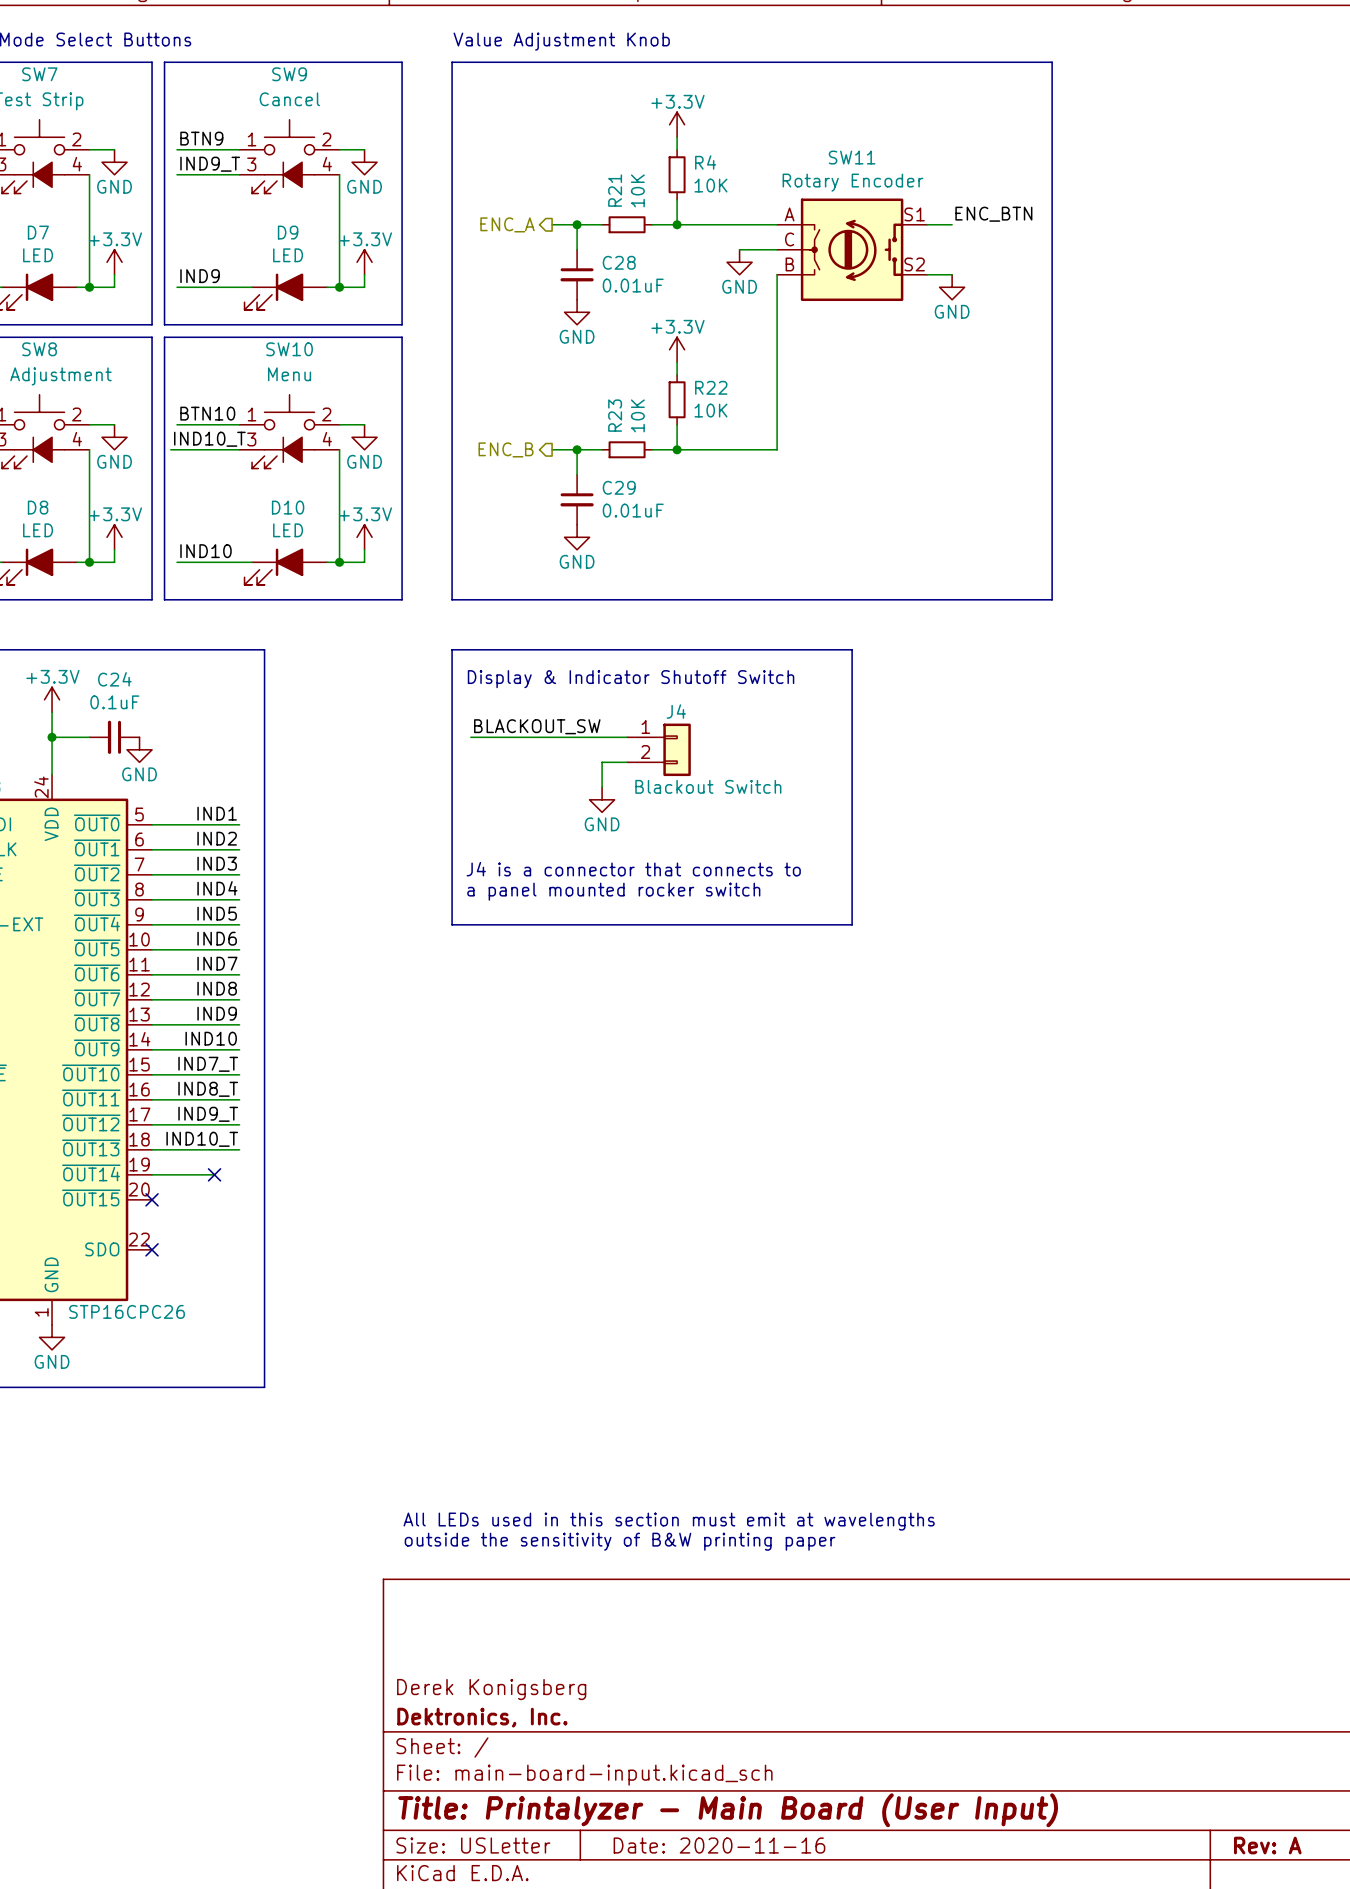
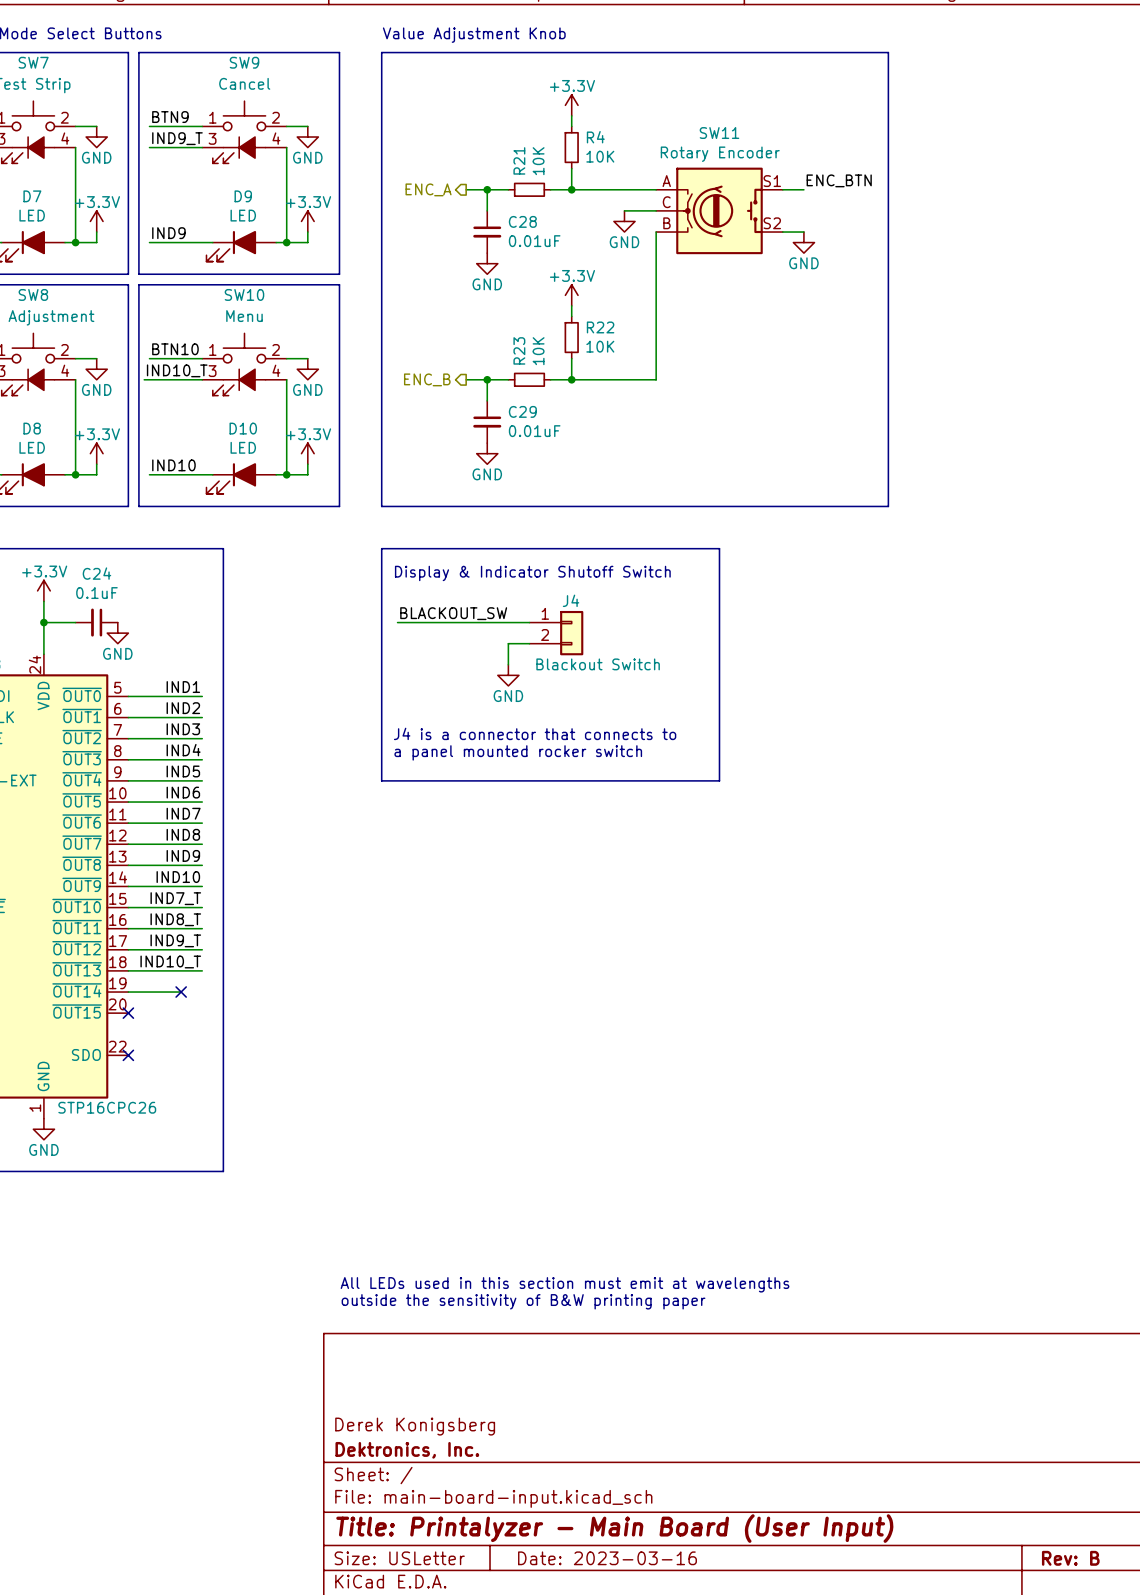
SW11 symbol: [777, 198, 928, 302] -> [656, 167, 783, 255]
title block: Date: 2020-11-16 (719, 1845) -> Date: 2023-03-16 (607, 1558)
title block: Rev: A (1267, 1845) -> Rev: B (1070, 1558)

